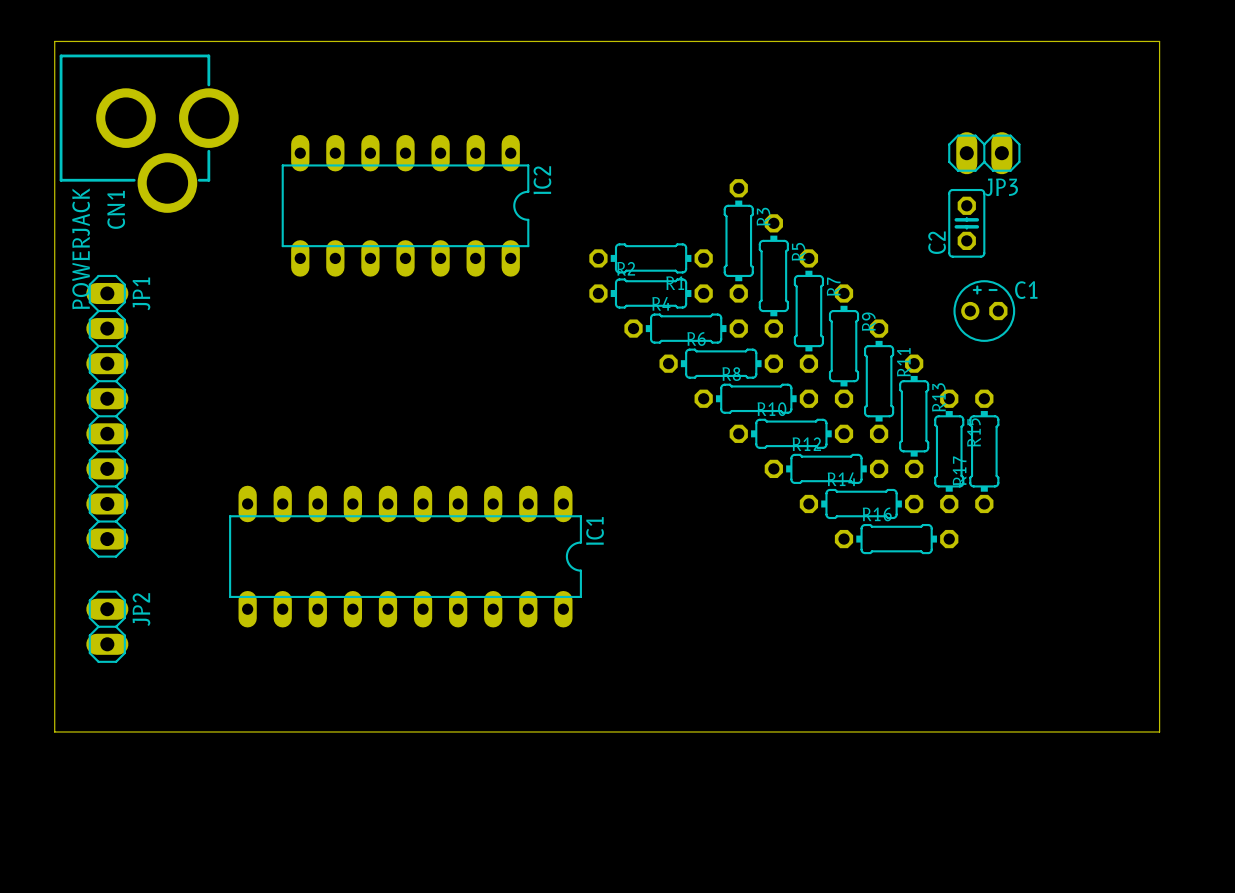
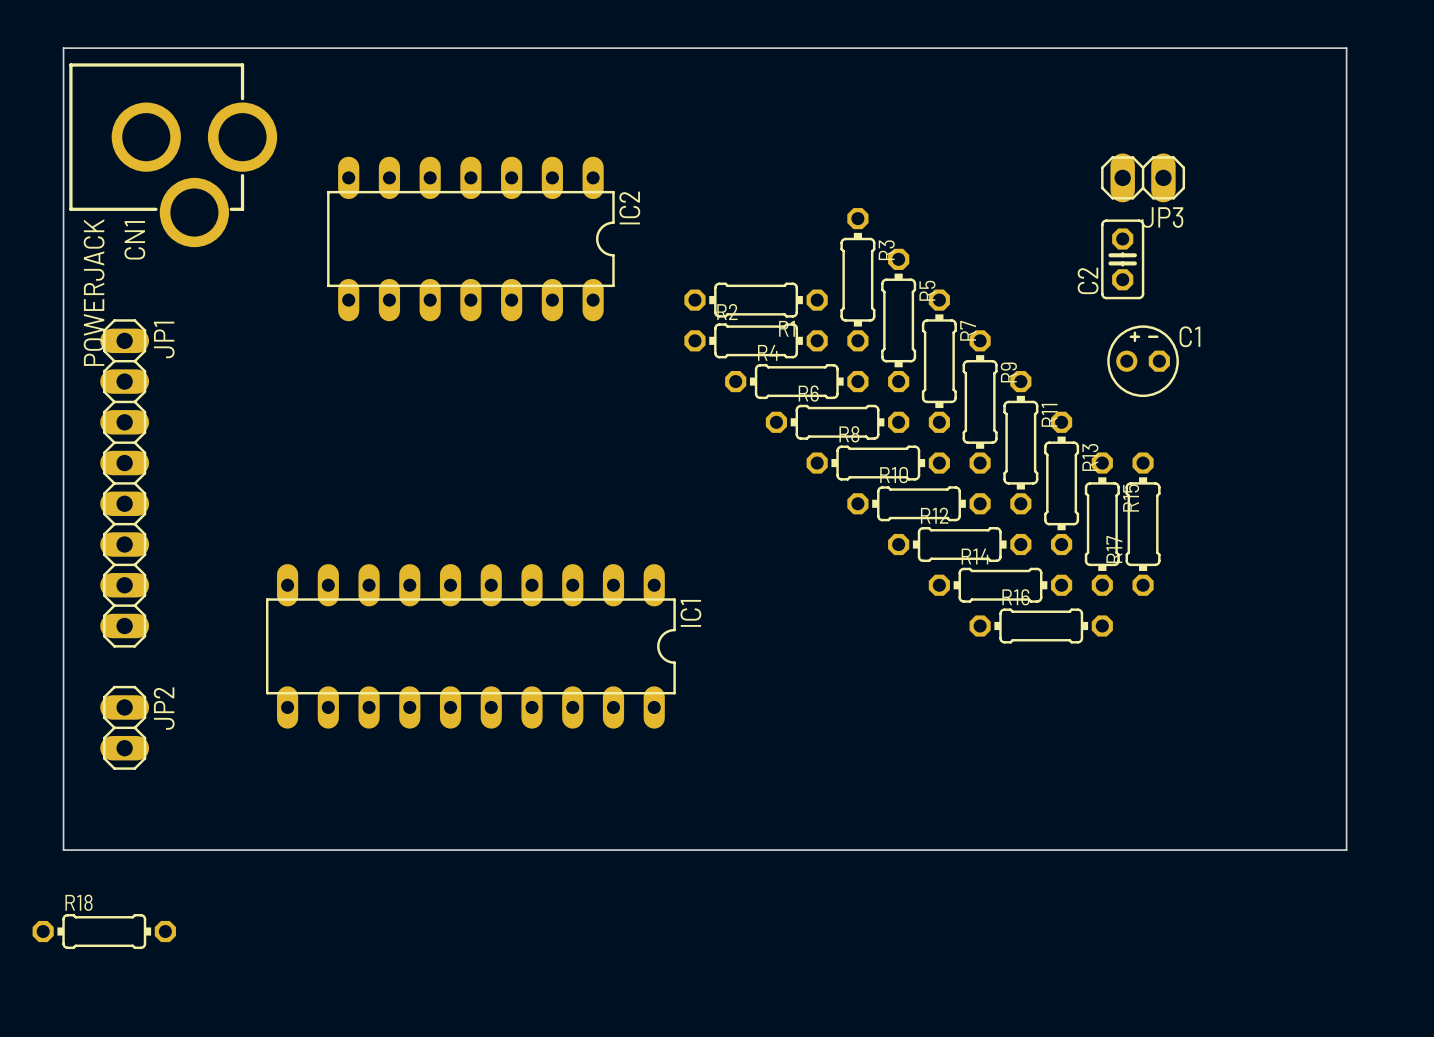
R18: none -> (104, 931)

